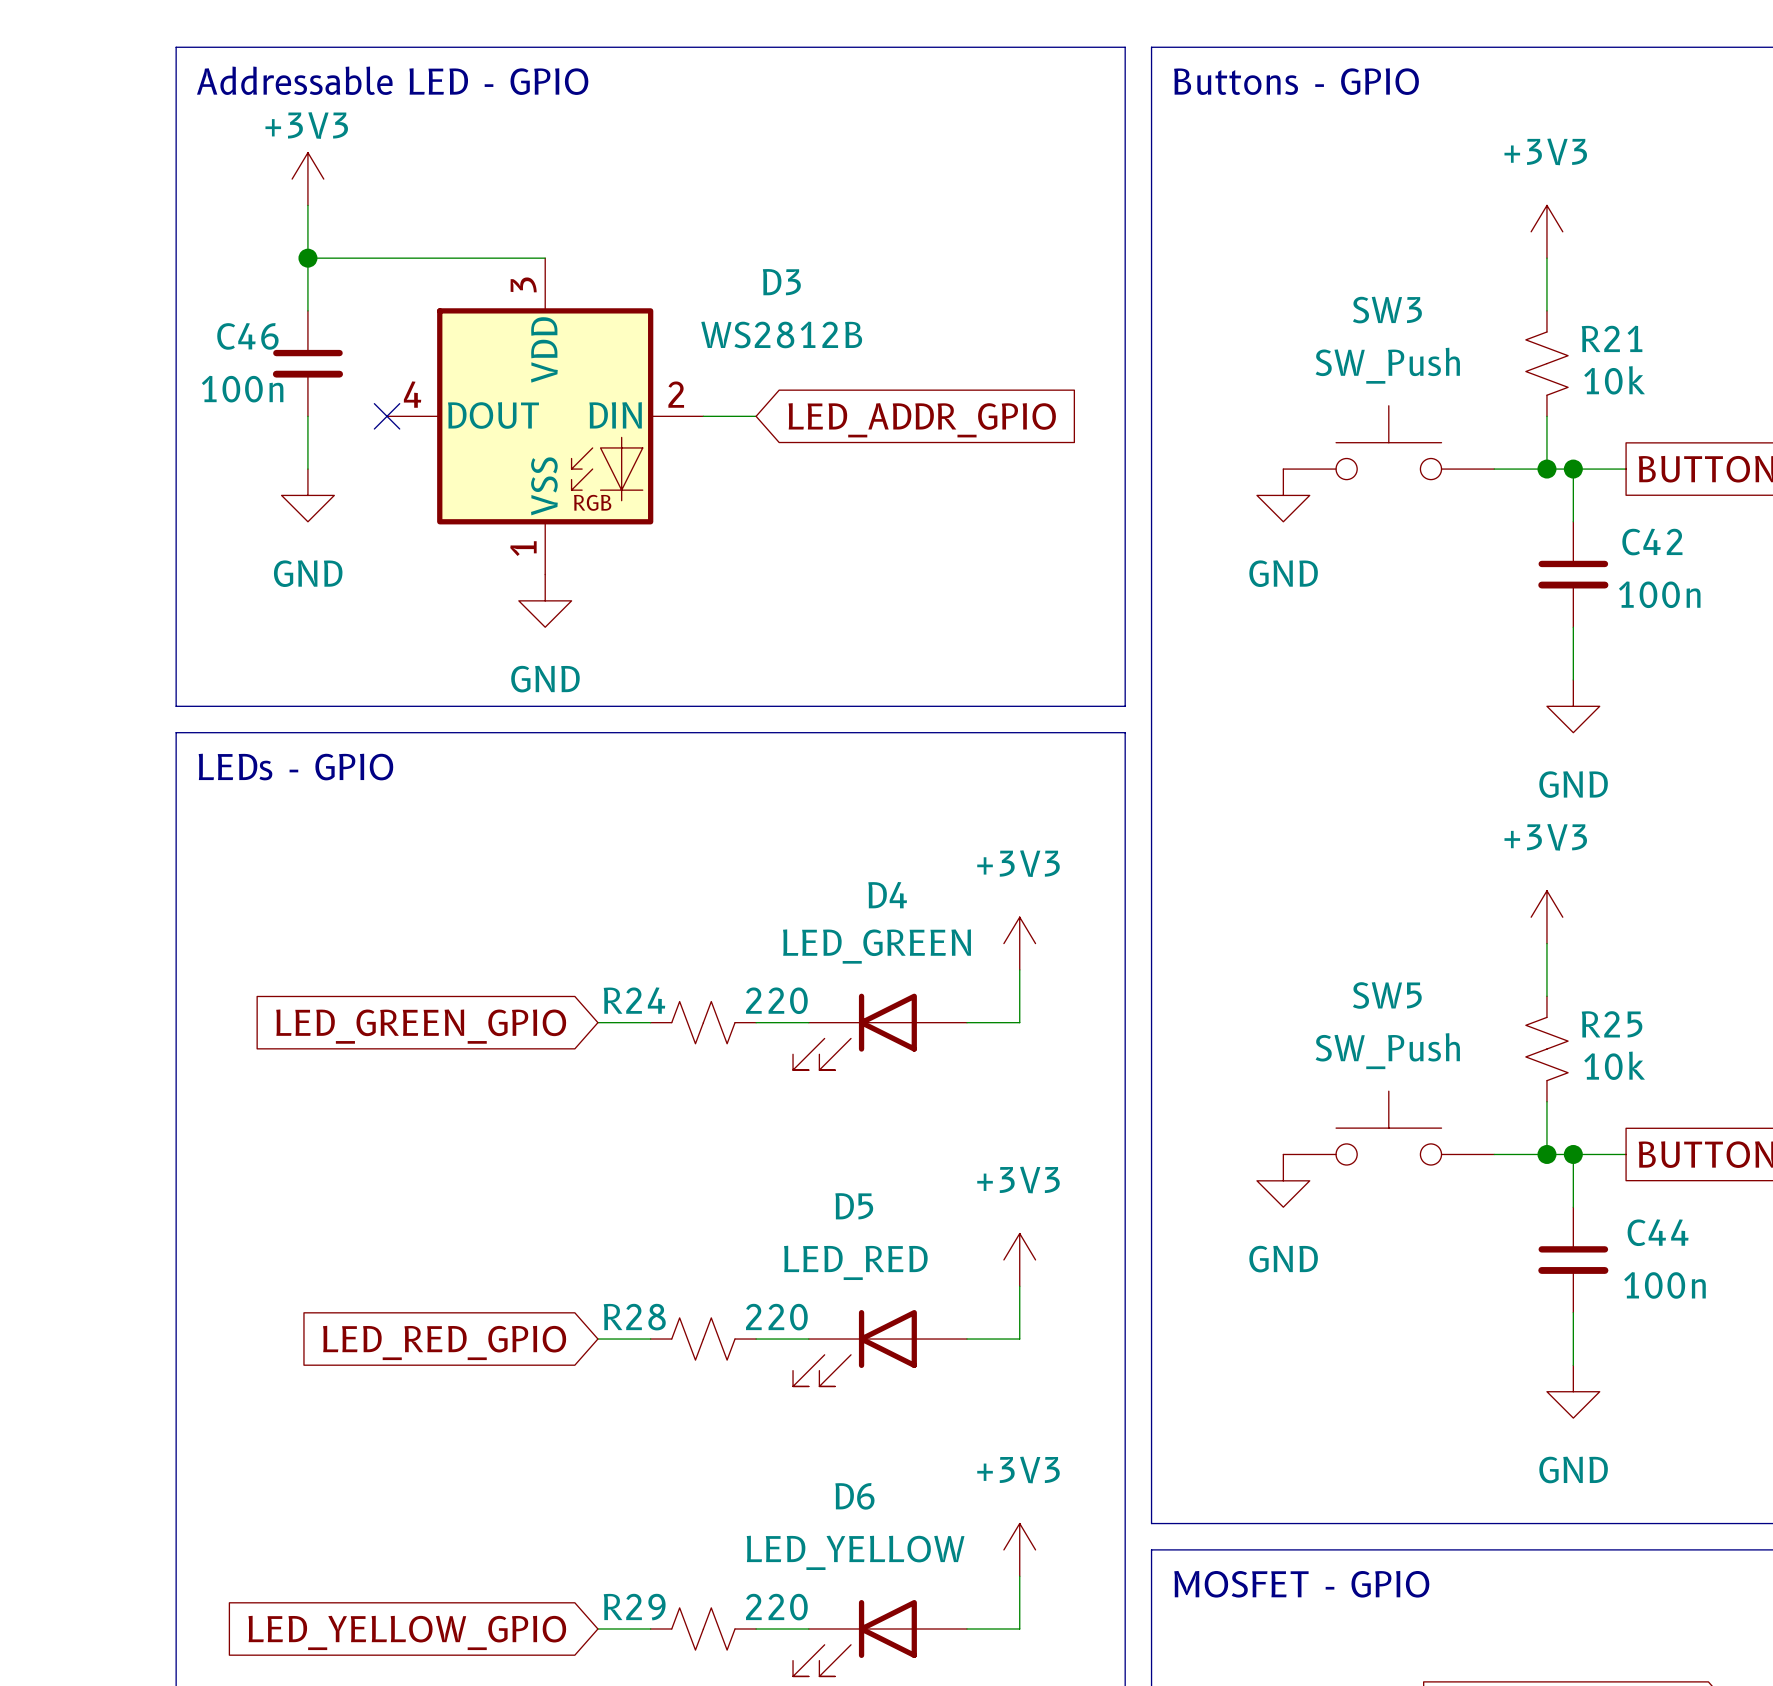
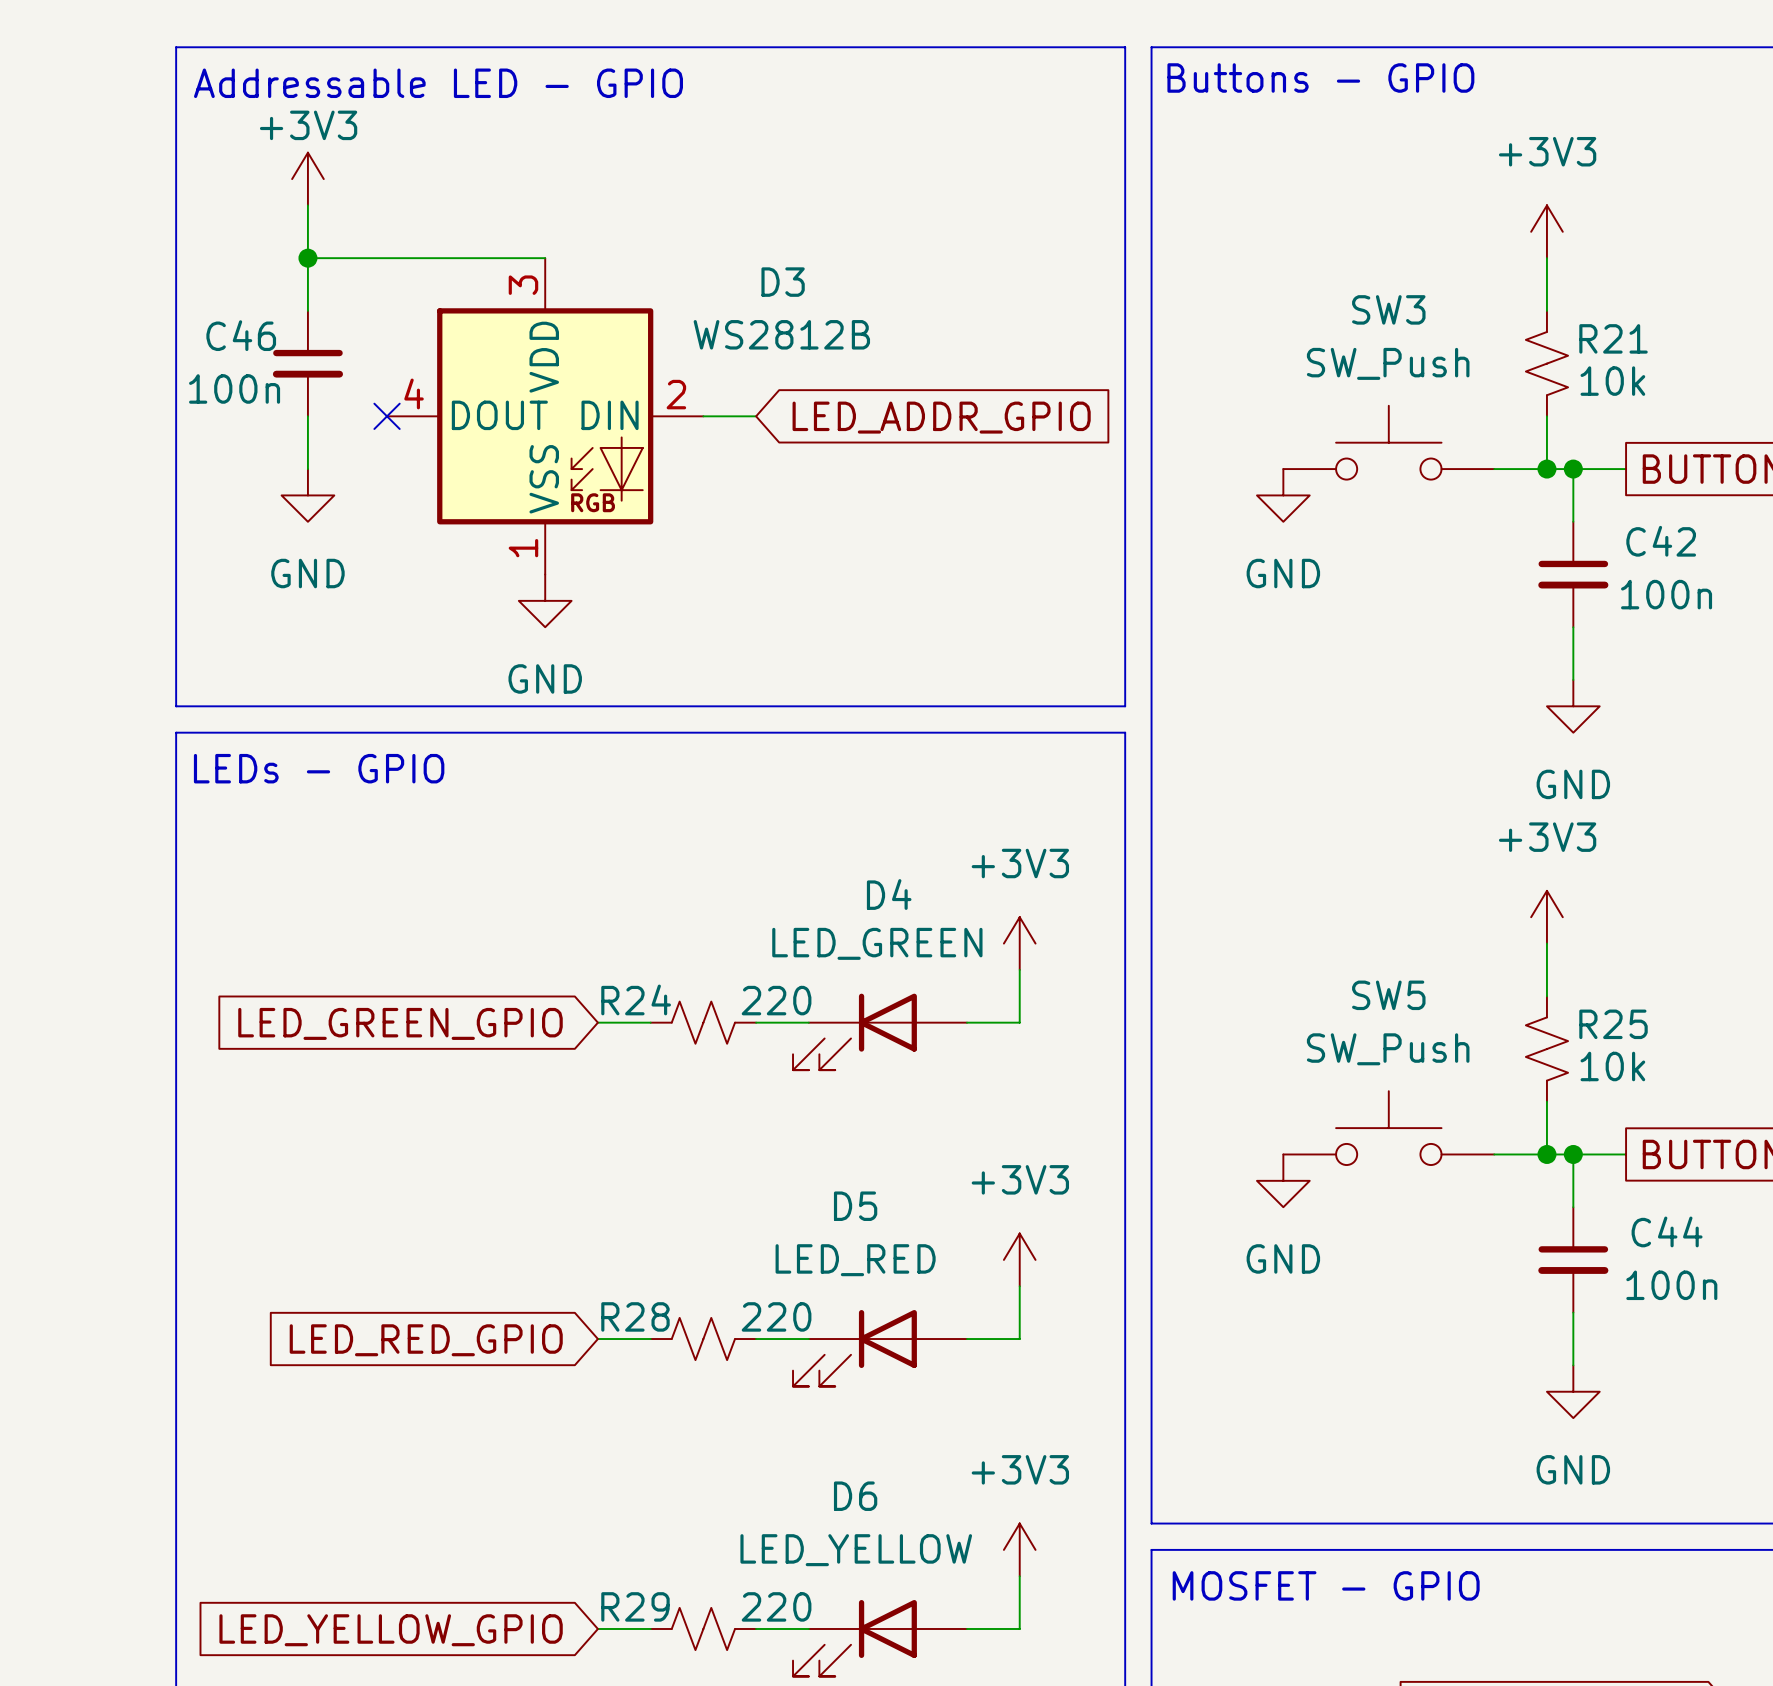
text position: Addressable LED - GPIO (392, 80) -> Addressable LED - GPIO (438, 83)
text position: Buttons - GPIO (1296, 81) -> Buttons - GPIO (1320, 77)
text position: LEDs - GPIO (295, 767) -> LEDs - GPIO (319, 768)
text position: MOSFET - GPIO (1301, 1584) -> MOSFET - GPIO (1326, 1585)

